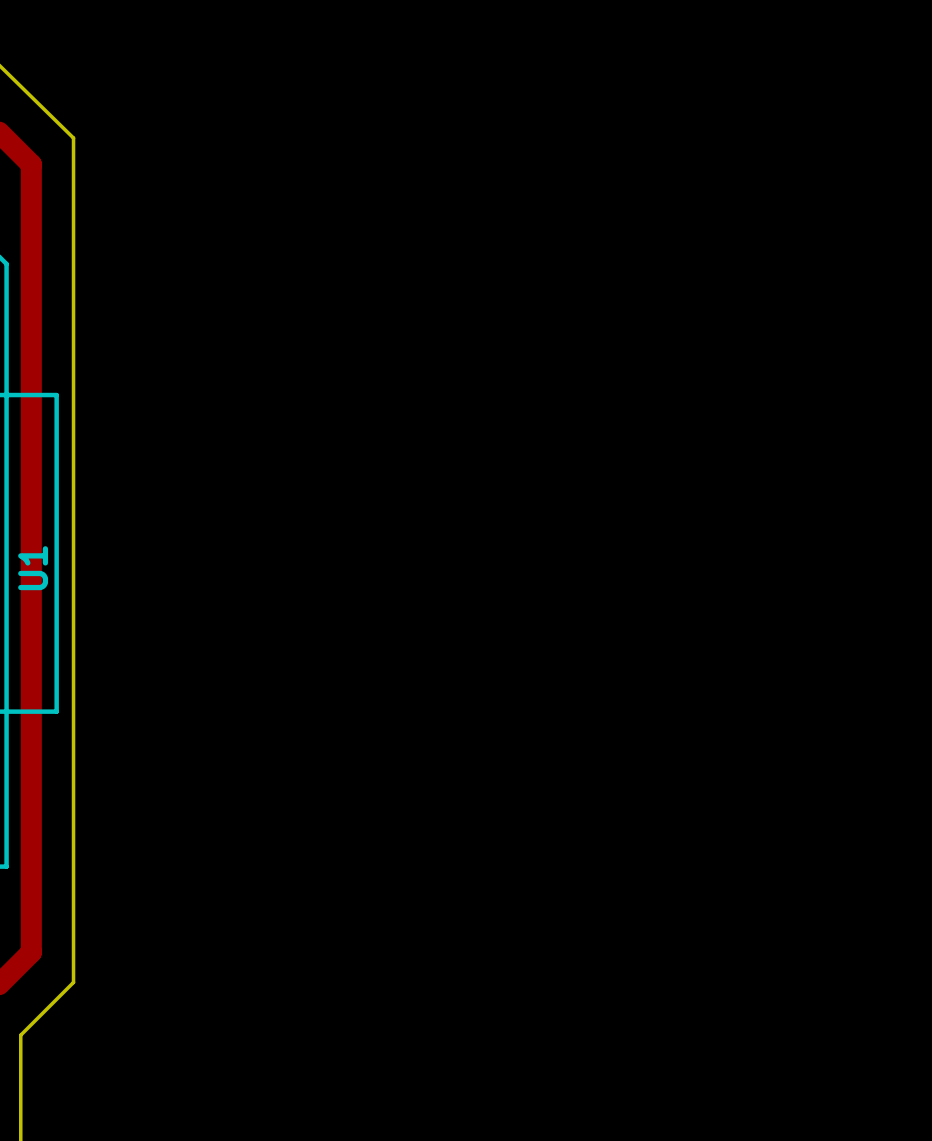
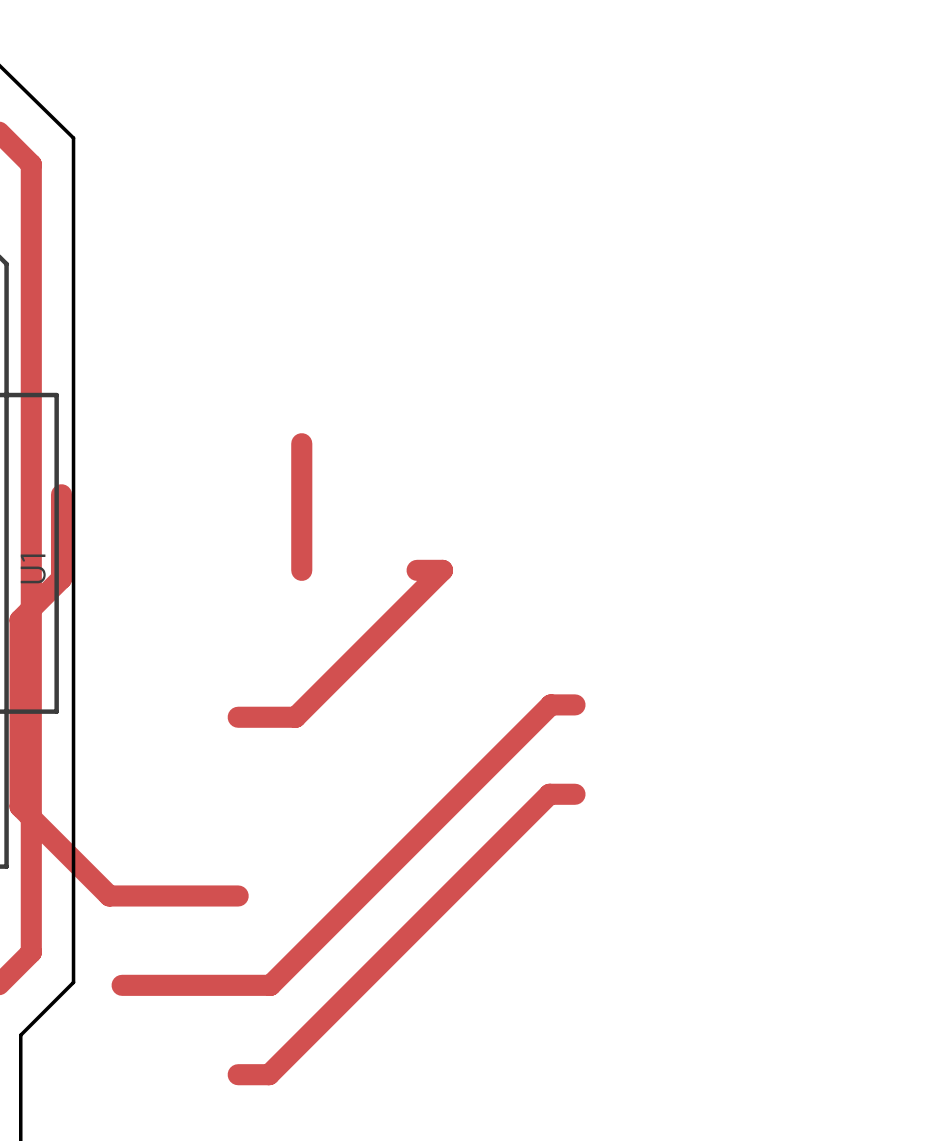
top track: none -> (301, 443) (301, 570)
top track: none -> (61, 494) (61, 578) (20, 620) (20, 806) (109, 895) (238, 895)
top track: none -> (417, 570) (442, 570) (295, 717) (238, 717)
top track: none -> (575, 704) (550, 704) (270, 985) (122, 985)
top track: none -> (575, 794) (549, 794) (269, 1074) (238, 1074)

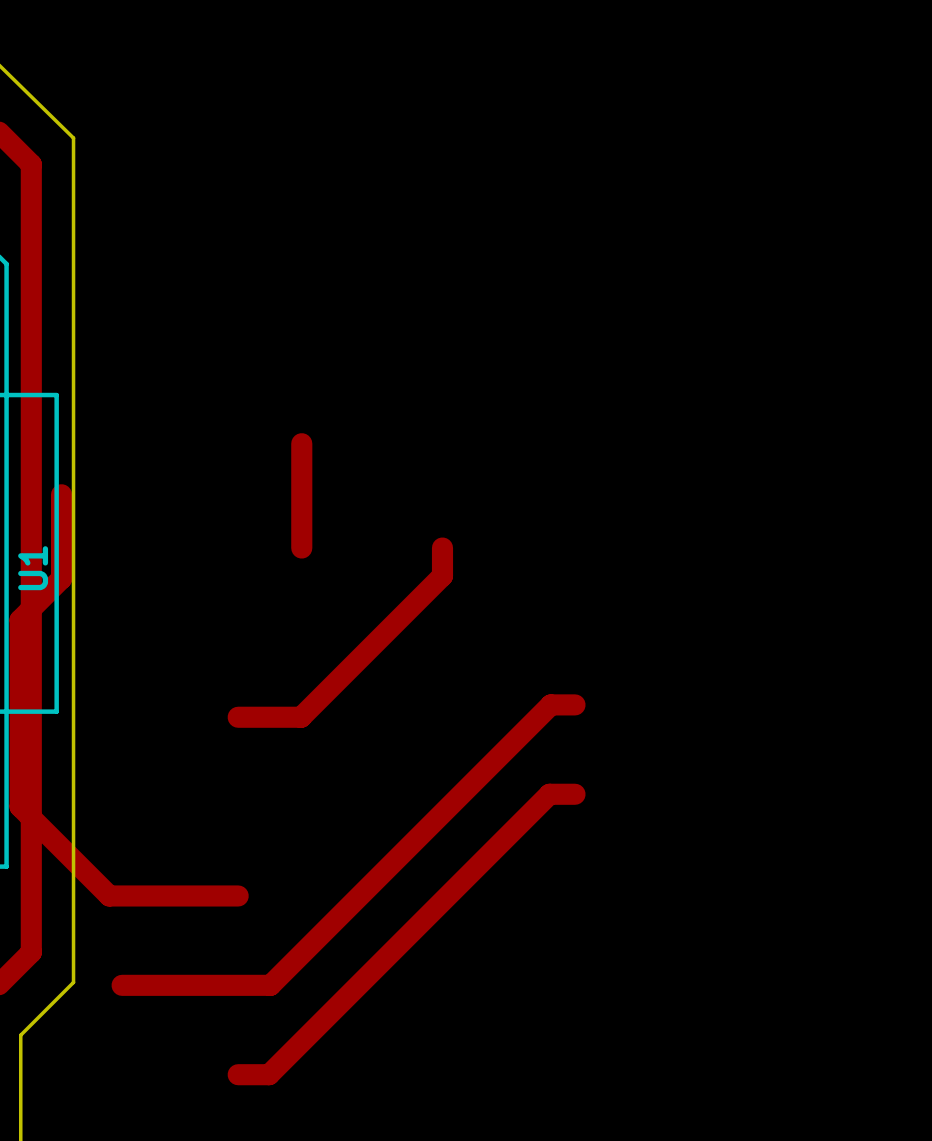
top track: (301, 548) (301, 570) -> none
top track: (417, 570) (442, 570) (295, 717) -> (442, 548) (442, 575) (301, 717) (295, 717)

